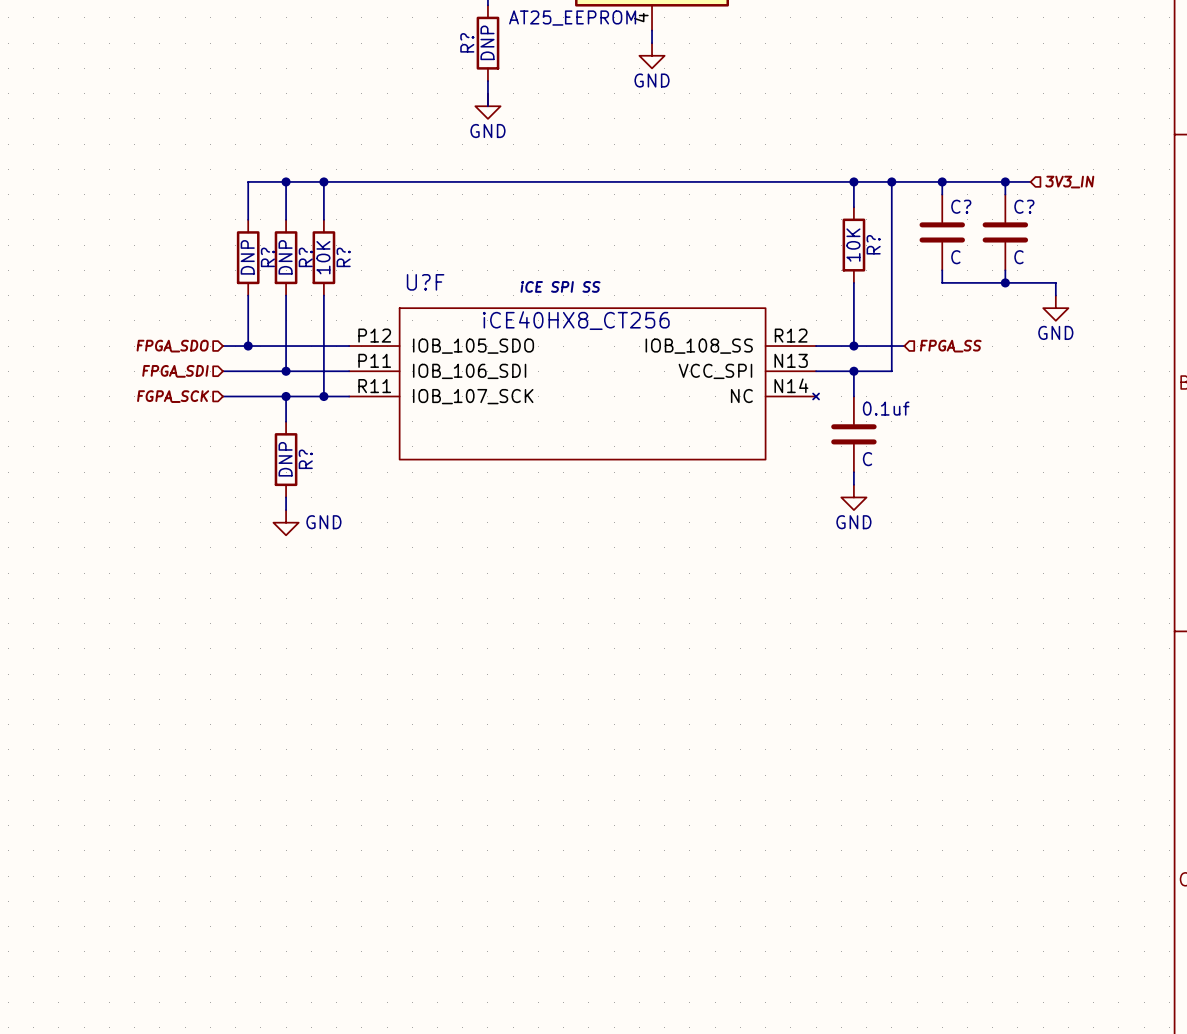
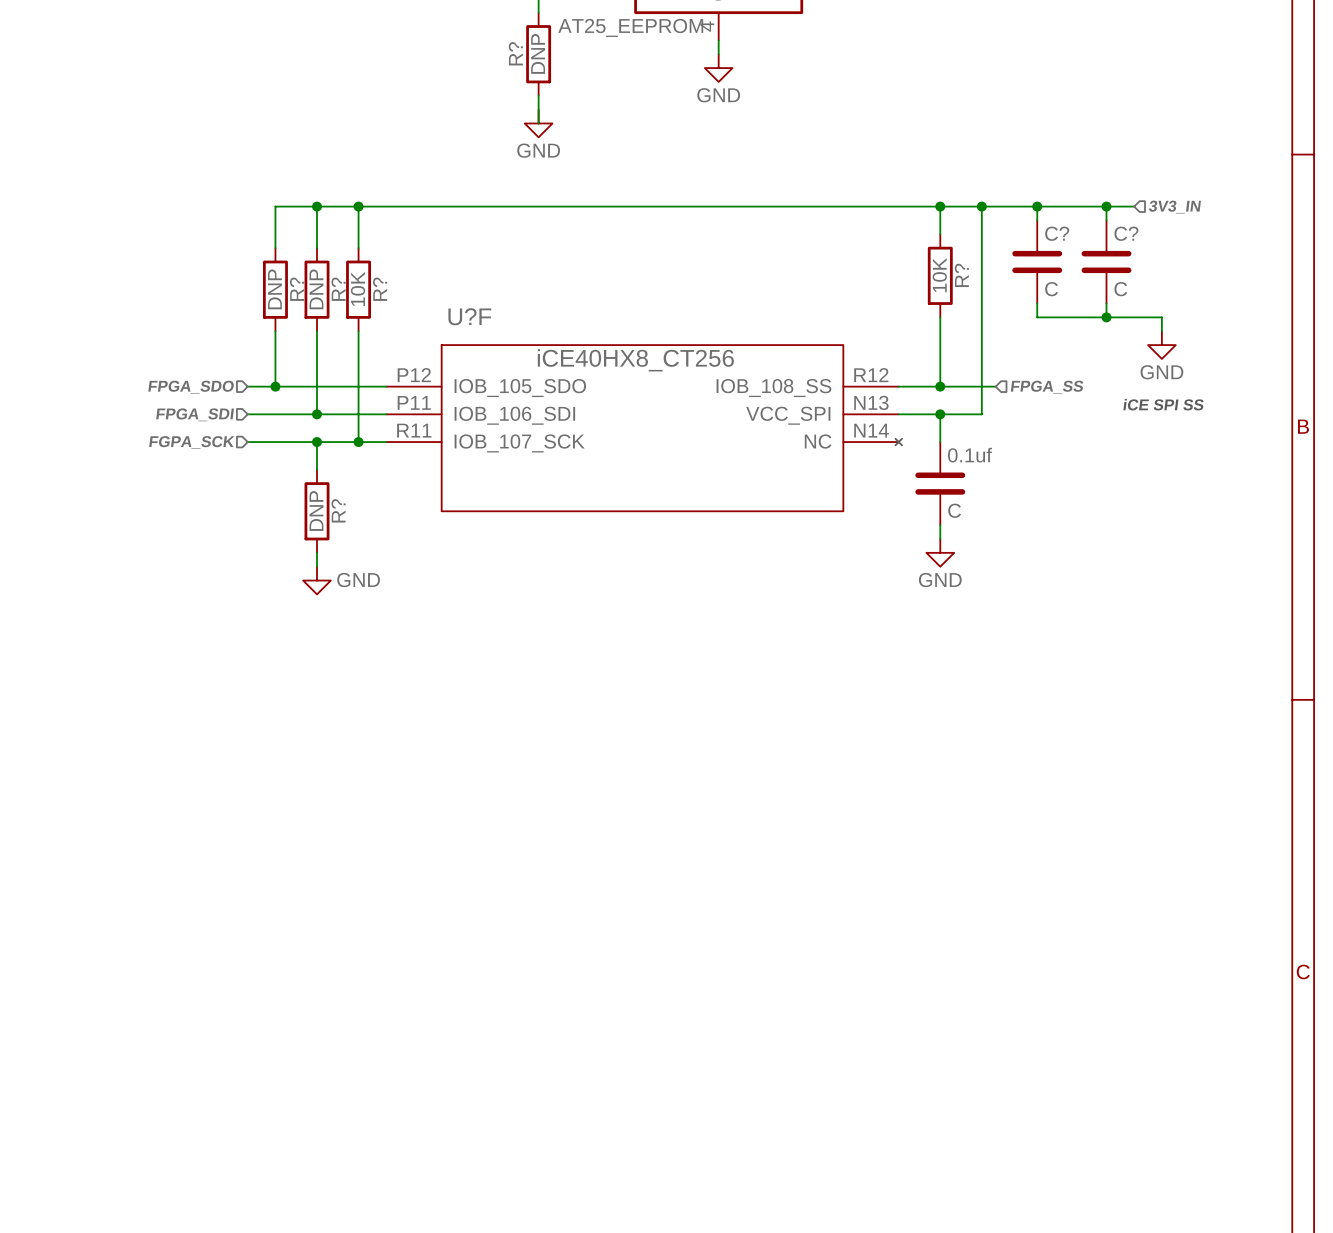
text: iCE SPI SS (560, 286) -> none
text: none -> iCE SPI SS (1163, 404)

